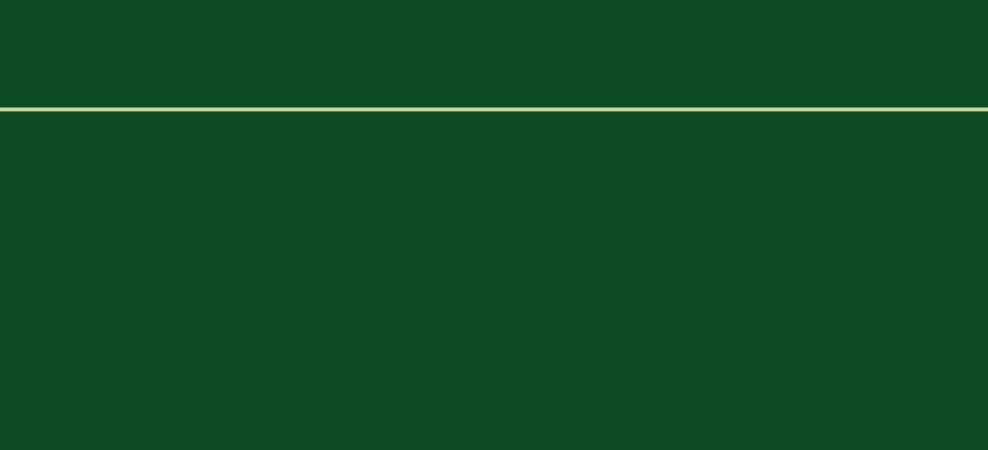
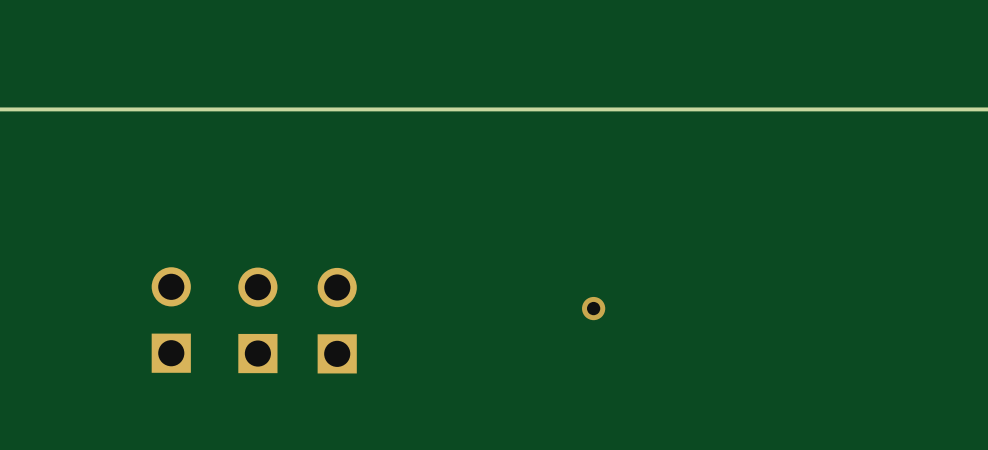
via: none -> (593, 308)
part: none -> (171, 320)
part: none -> (257, 320)
part: none -> (337, 320)

